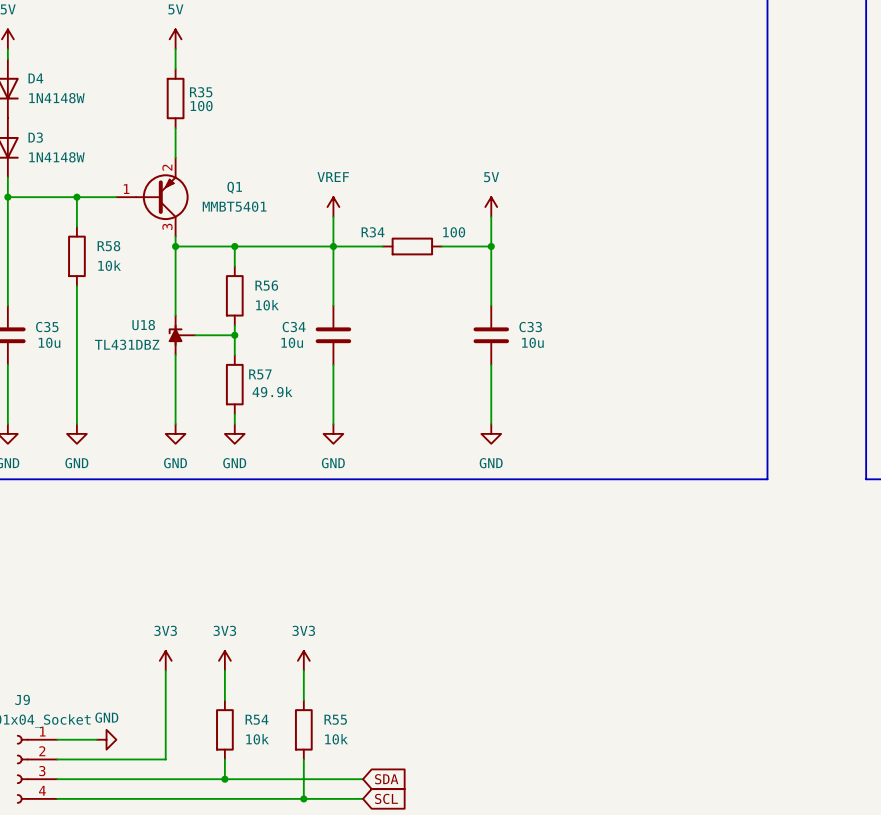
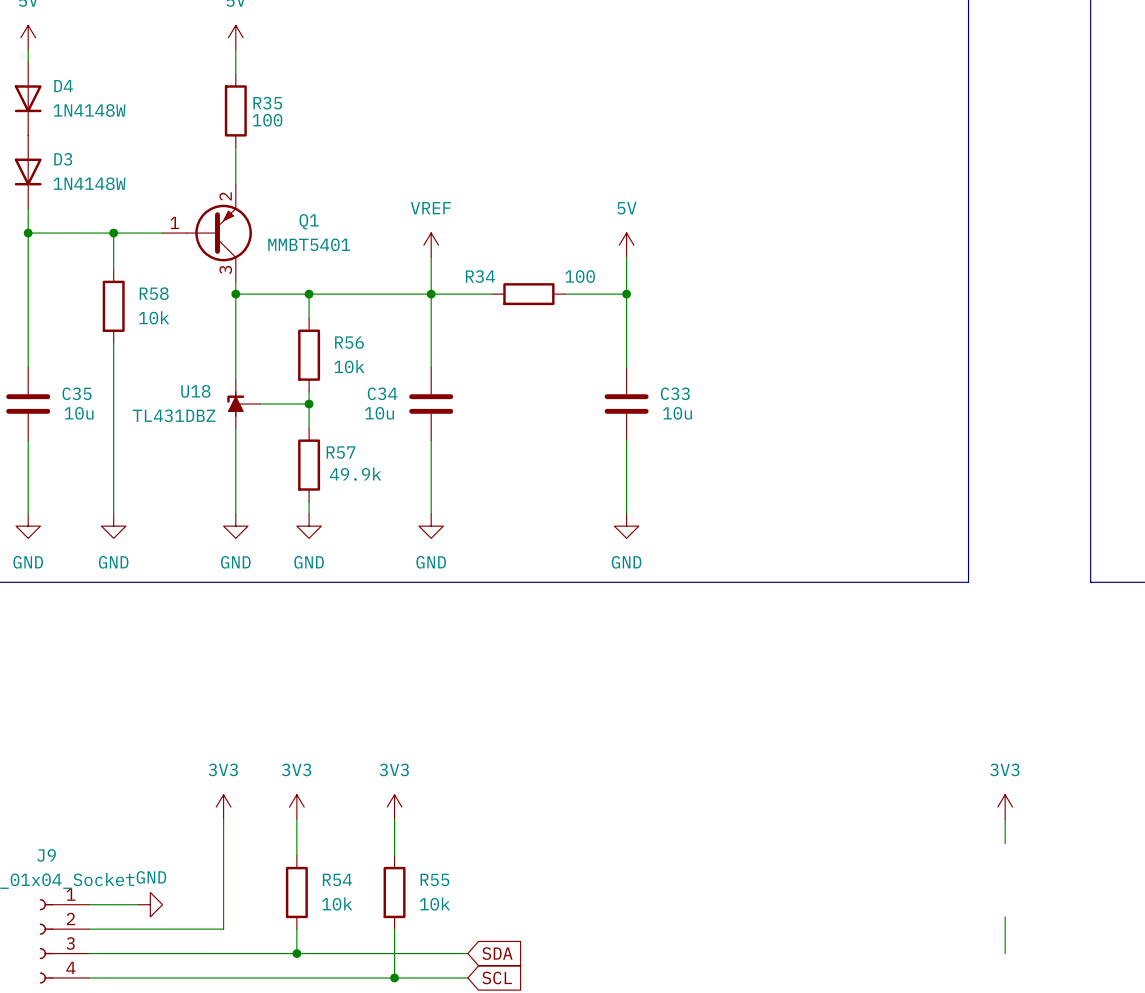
power symbol: none -> 3V3 (1005, 807)
wire: none -> (1005, 819) (1005, 843)
wire: none -> (1005, 916) (1005, 953)

